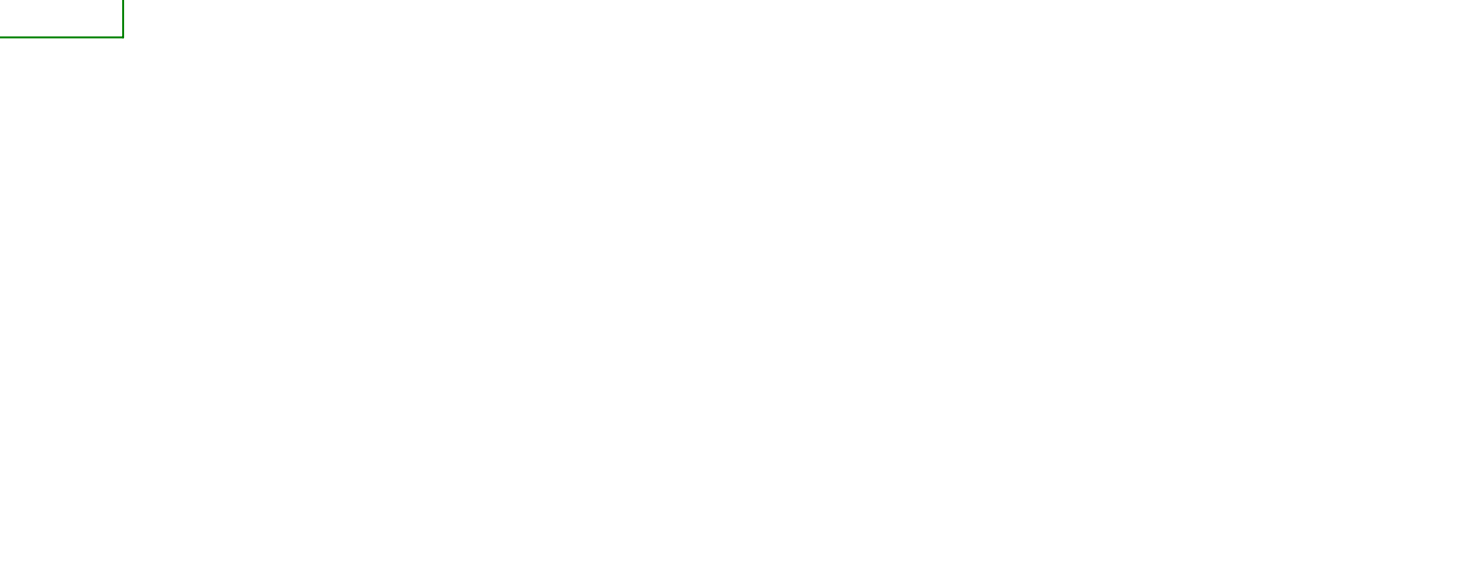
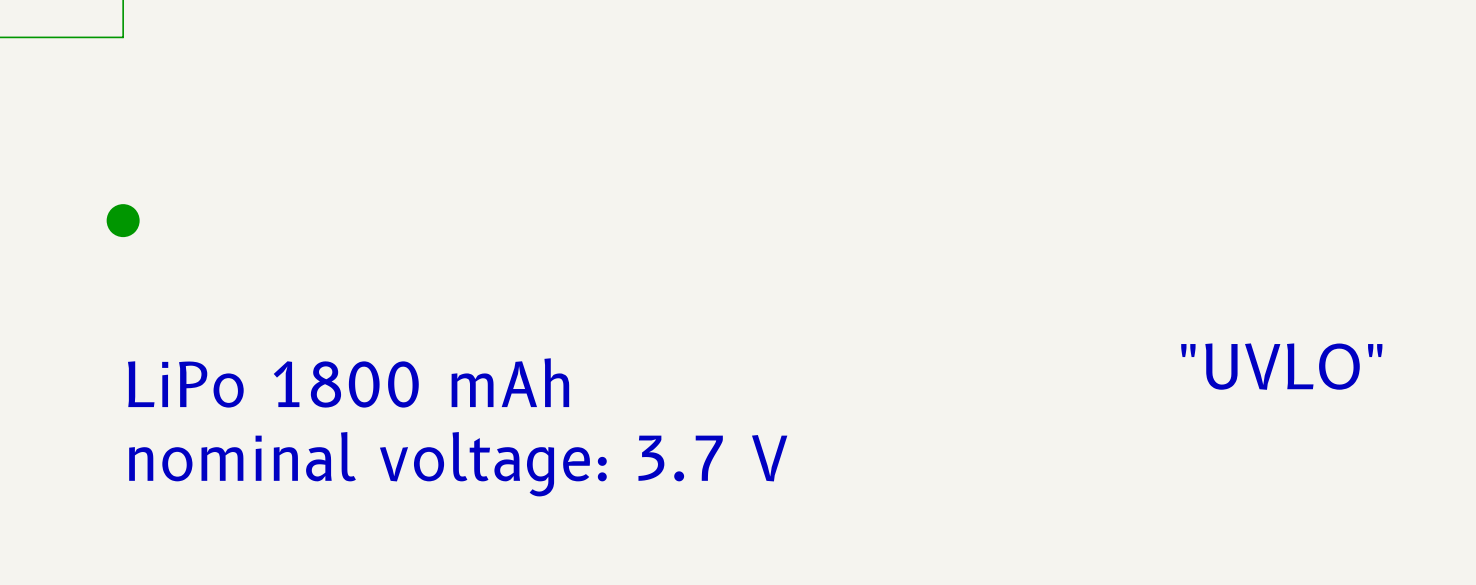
junction: none -> (123, 220)
text: none -> "UVLO" (1281, 366)
text: none -> LiPo 1800 mAh (348, 382)
text: none -> nominal voltage: 3.7 V (458, 464)

